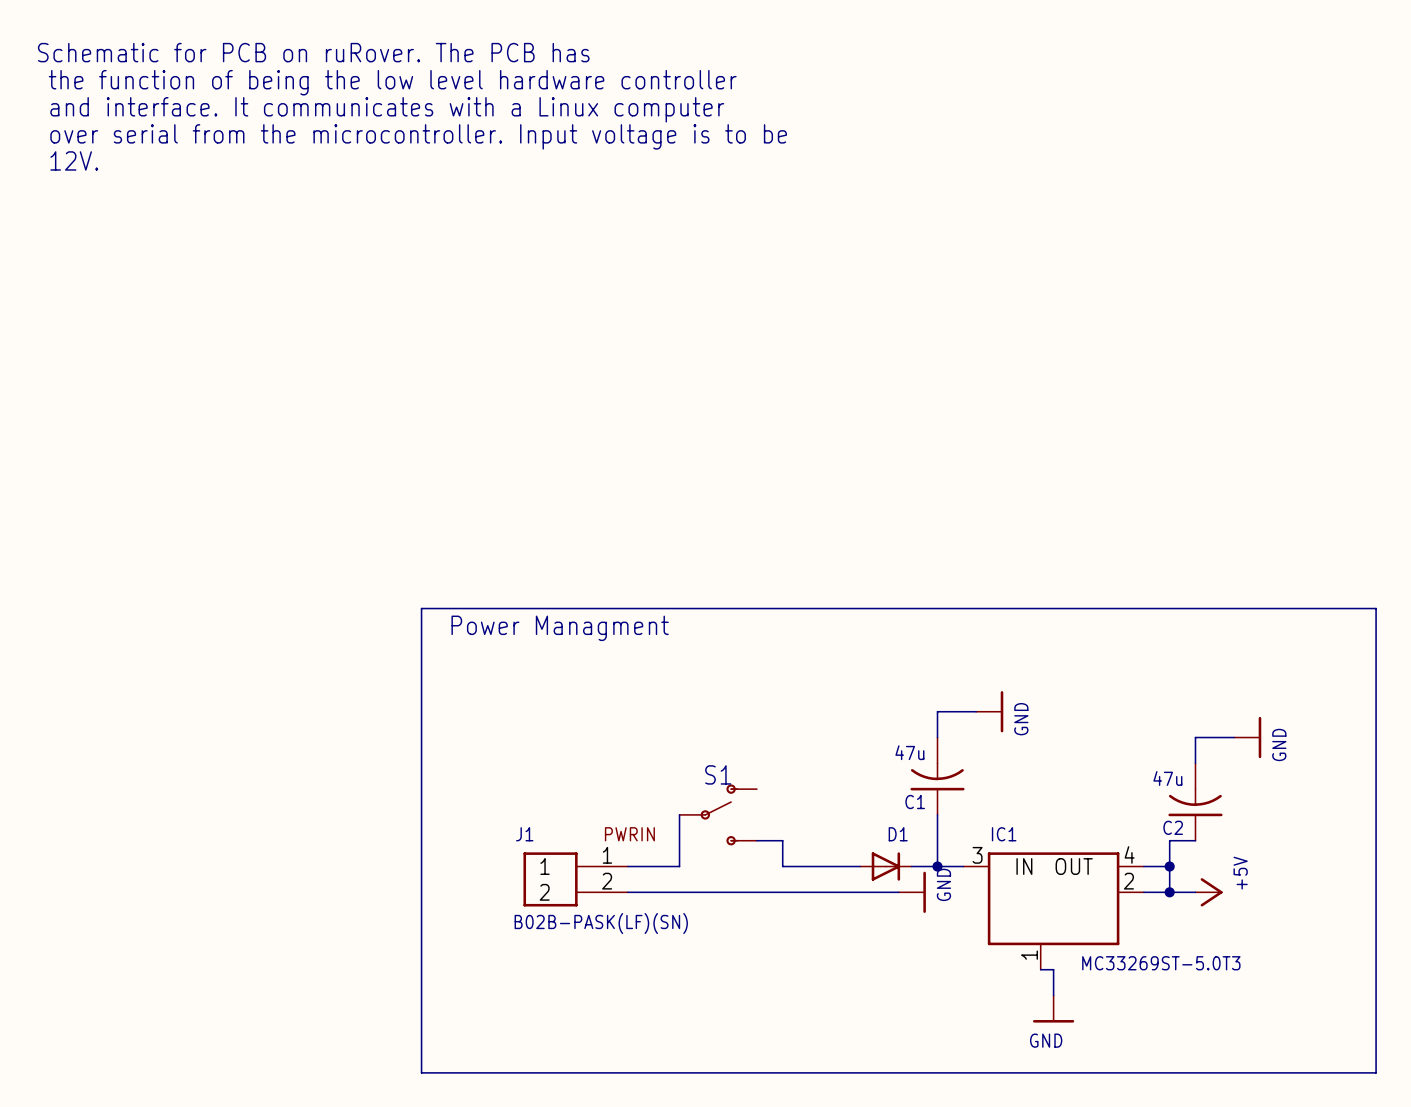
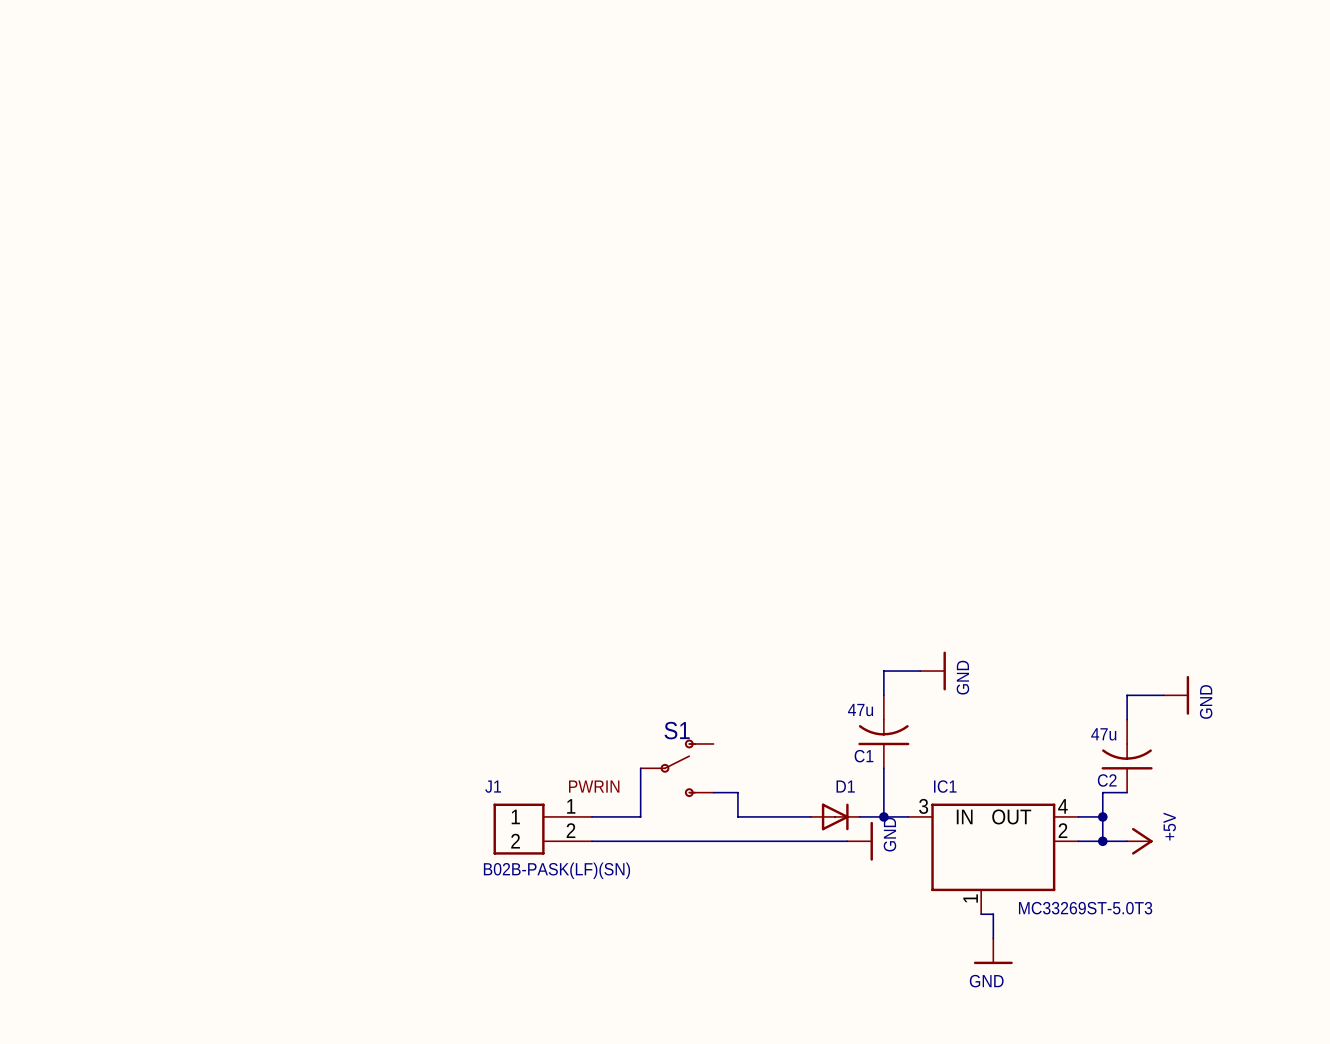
text: Schematic for PCB on ruRover. The PCB has (313, 52) -> none
text: the function of being the low level hardware controller (392, 82) -> none
text: and interface. It communicates with a Linux computer (387, 109) -> none
text: over serial from the microcontroller. Input voltage is to be (418, 136) -> none
text: 12V. (74, 160) -> none
wire: (421, 608) (421, 1072) (1376, 1072) (1376, 608) (421, 608) -> none
text: Power Managment (560, 628) -> none

